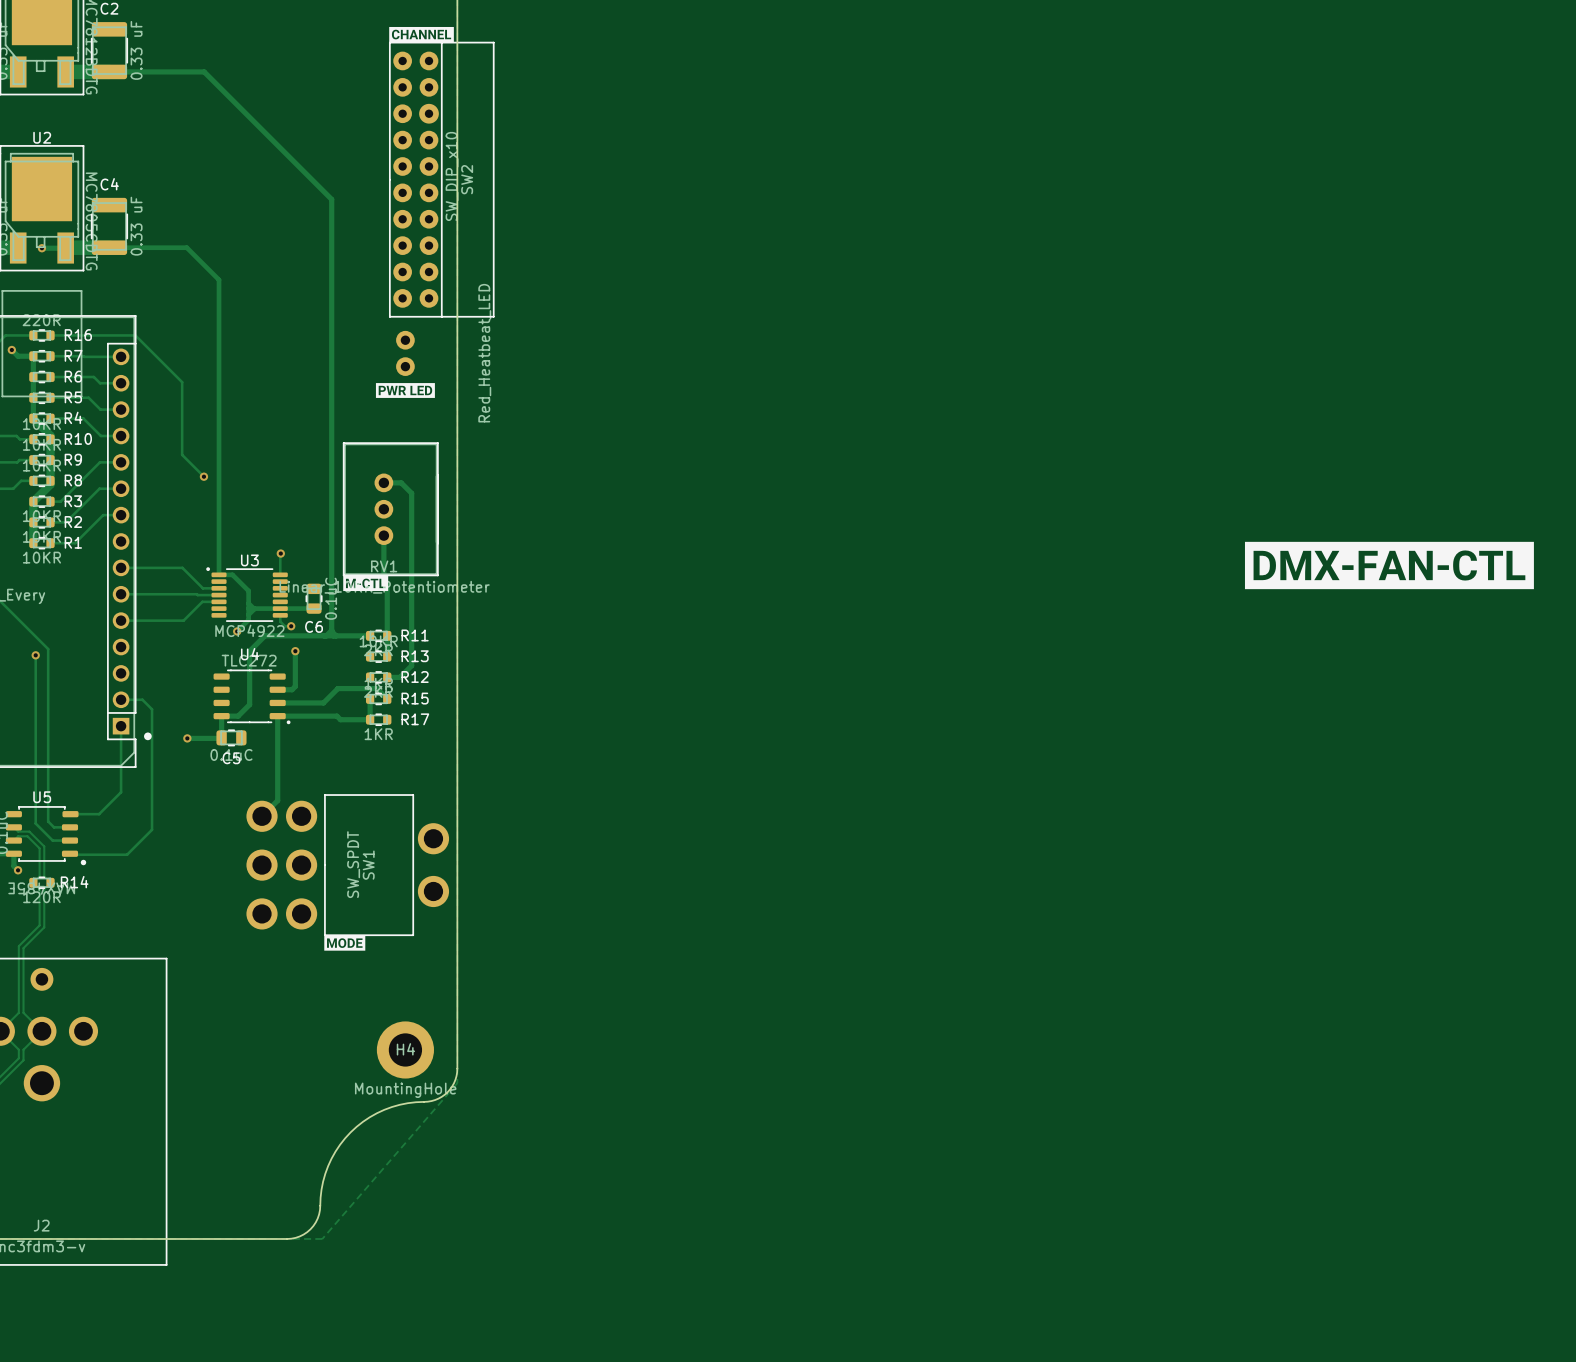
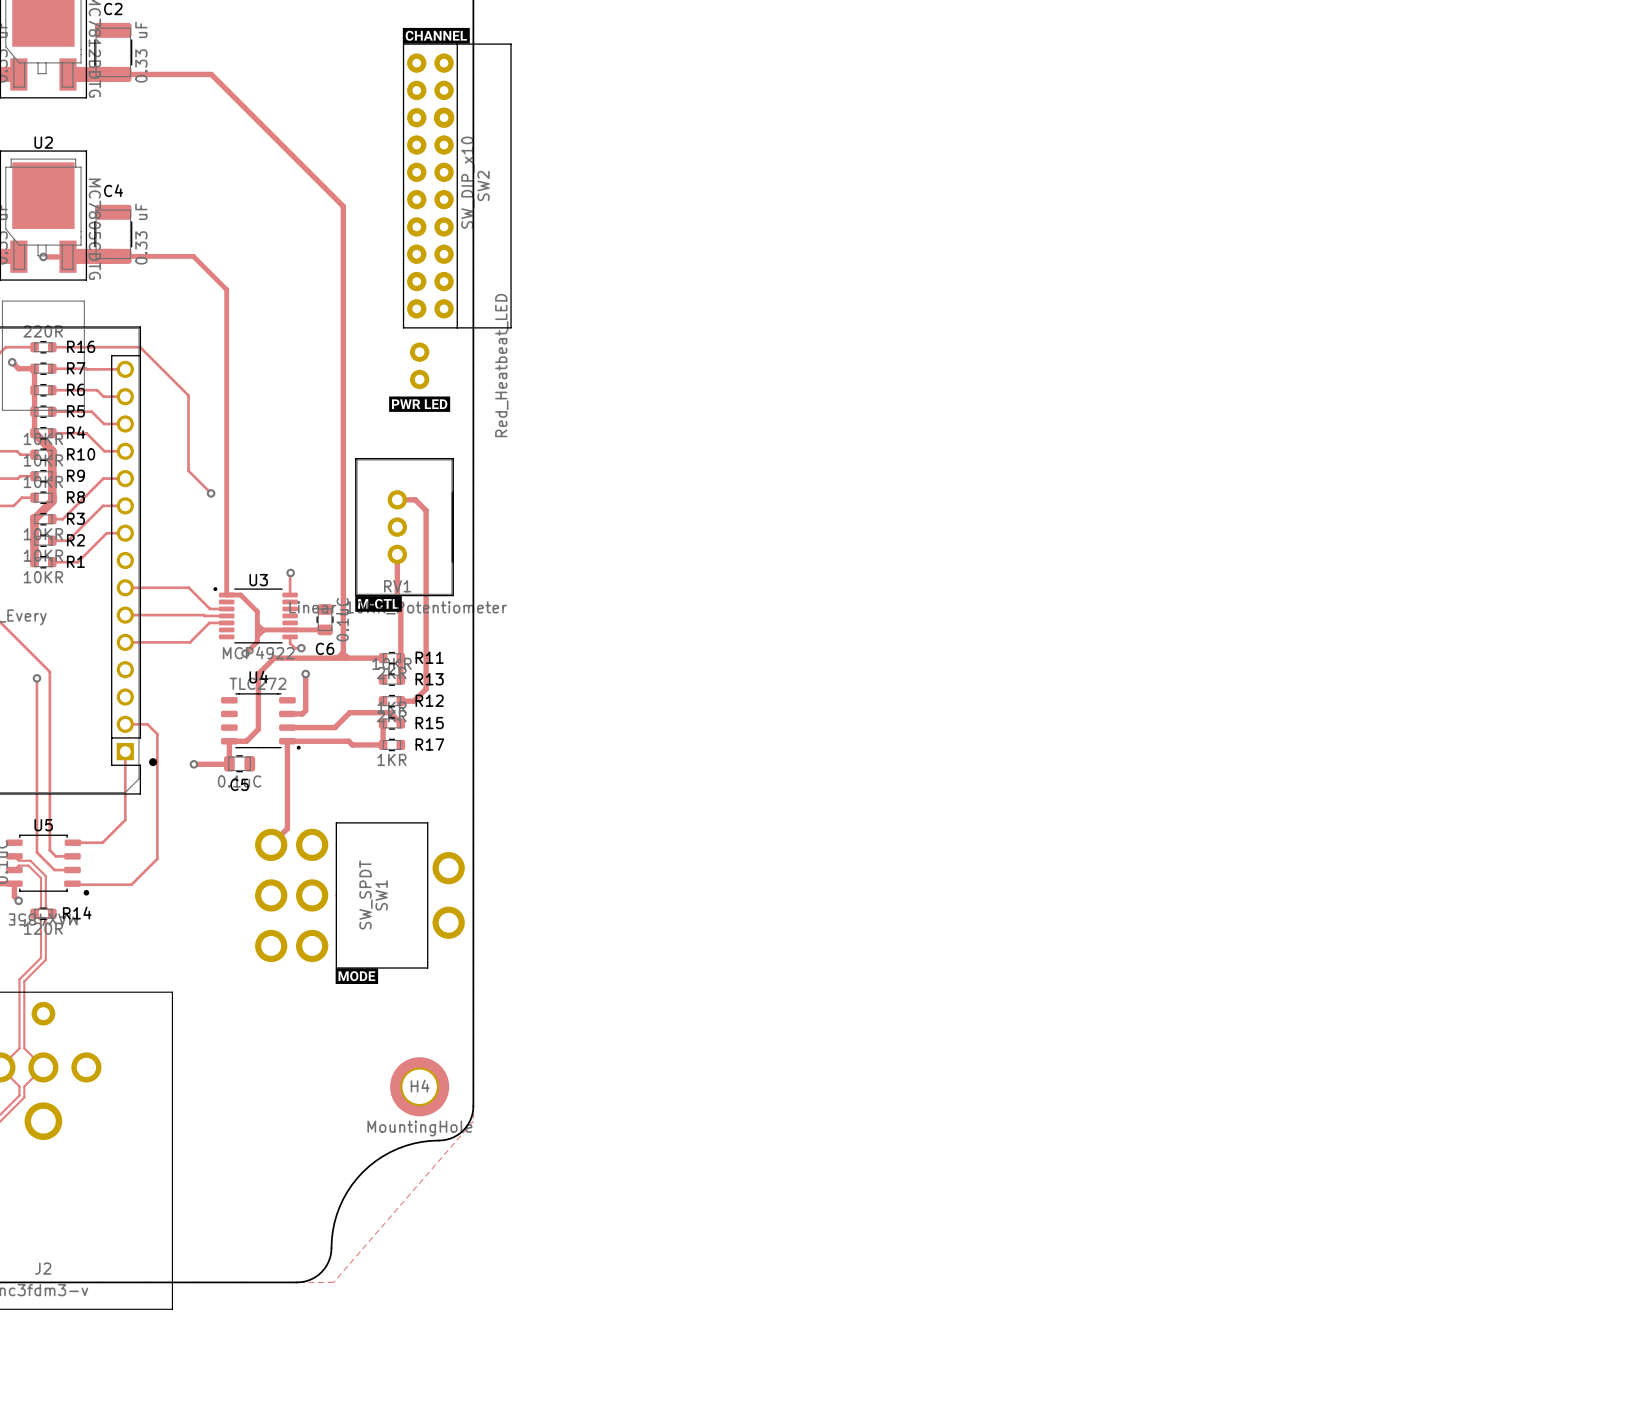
drawing: [1244, 541, 1534, 590] -> none

